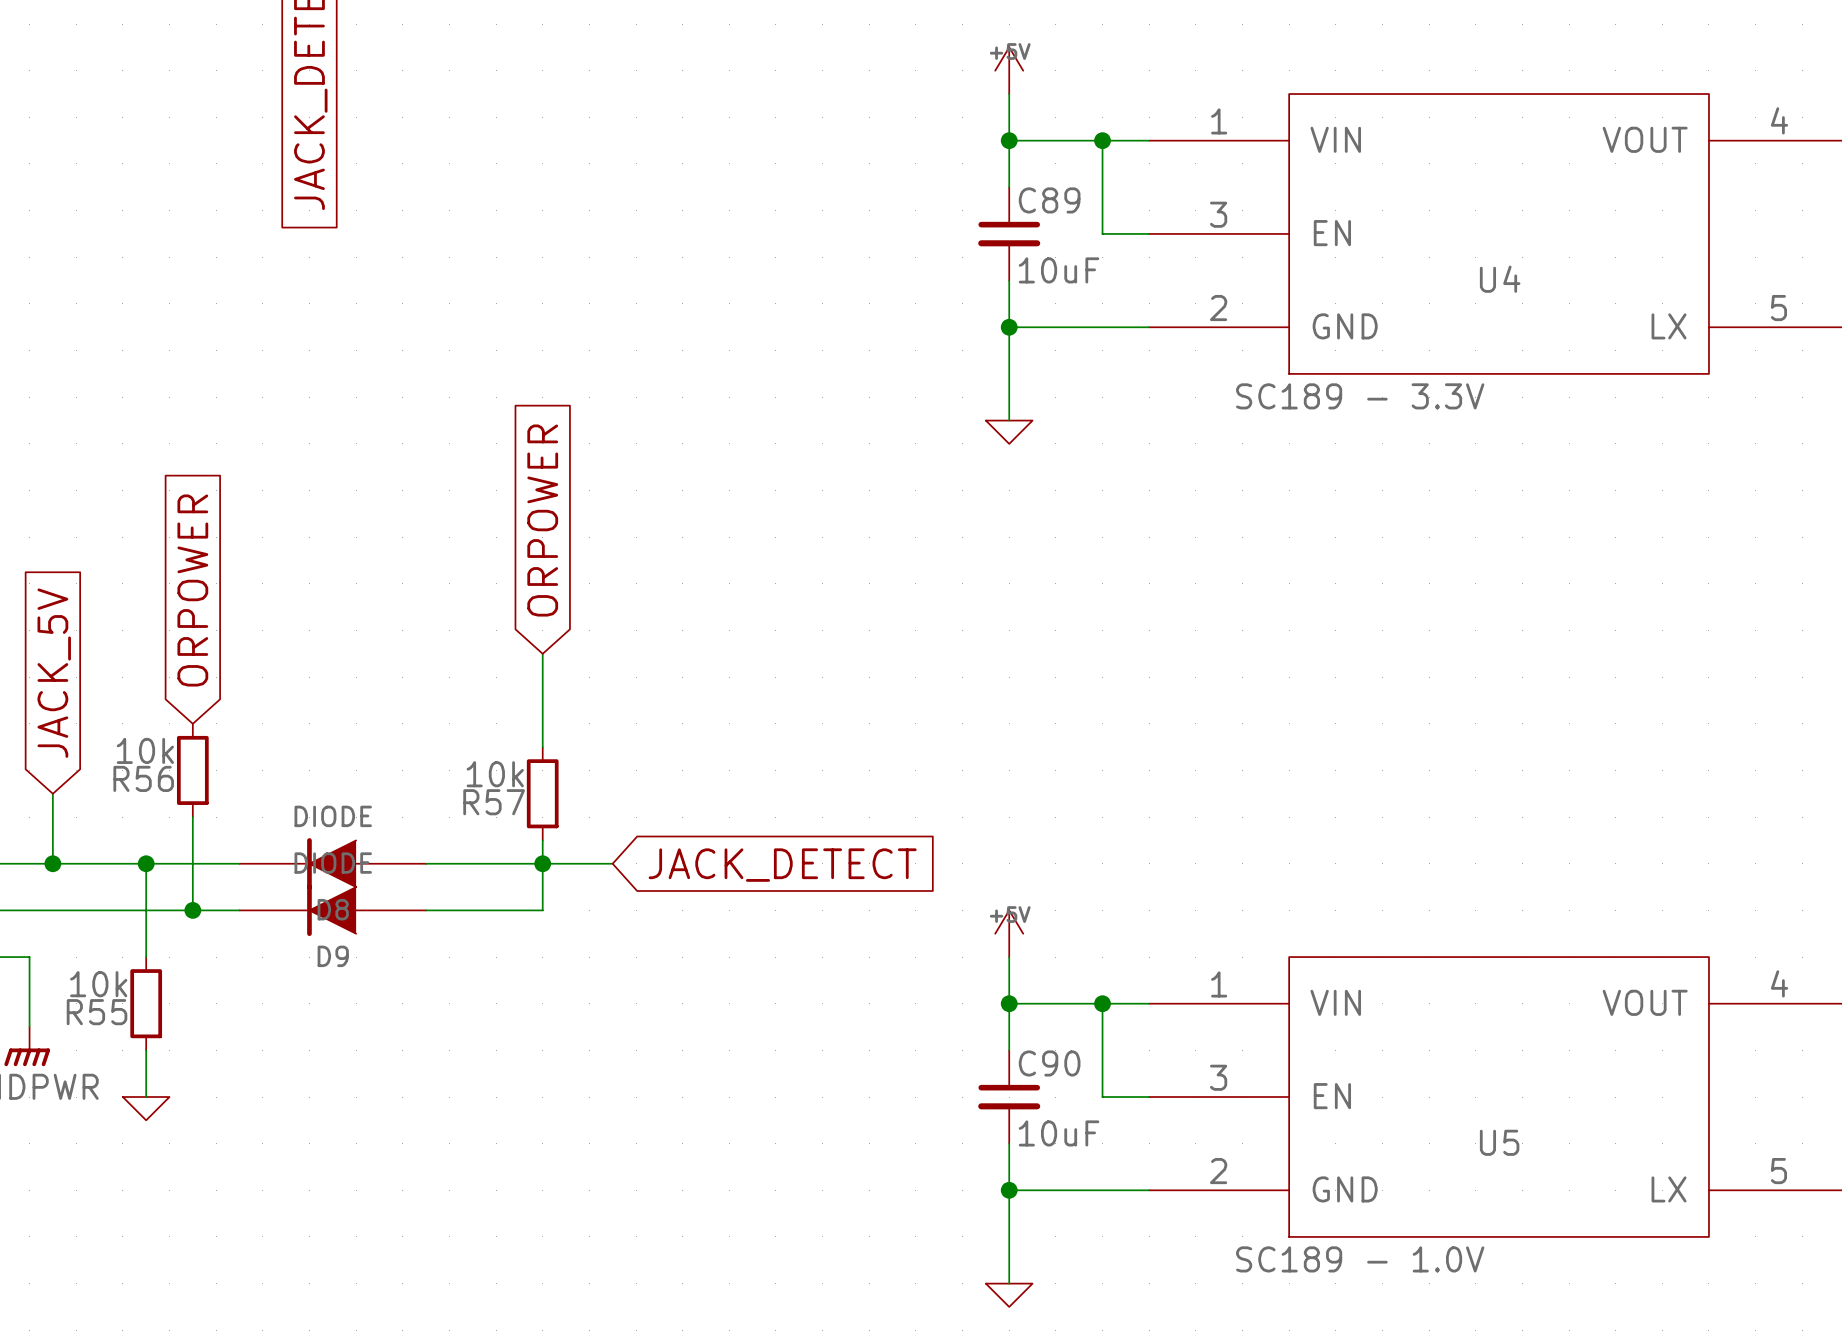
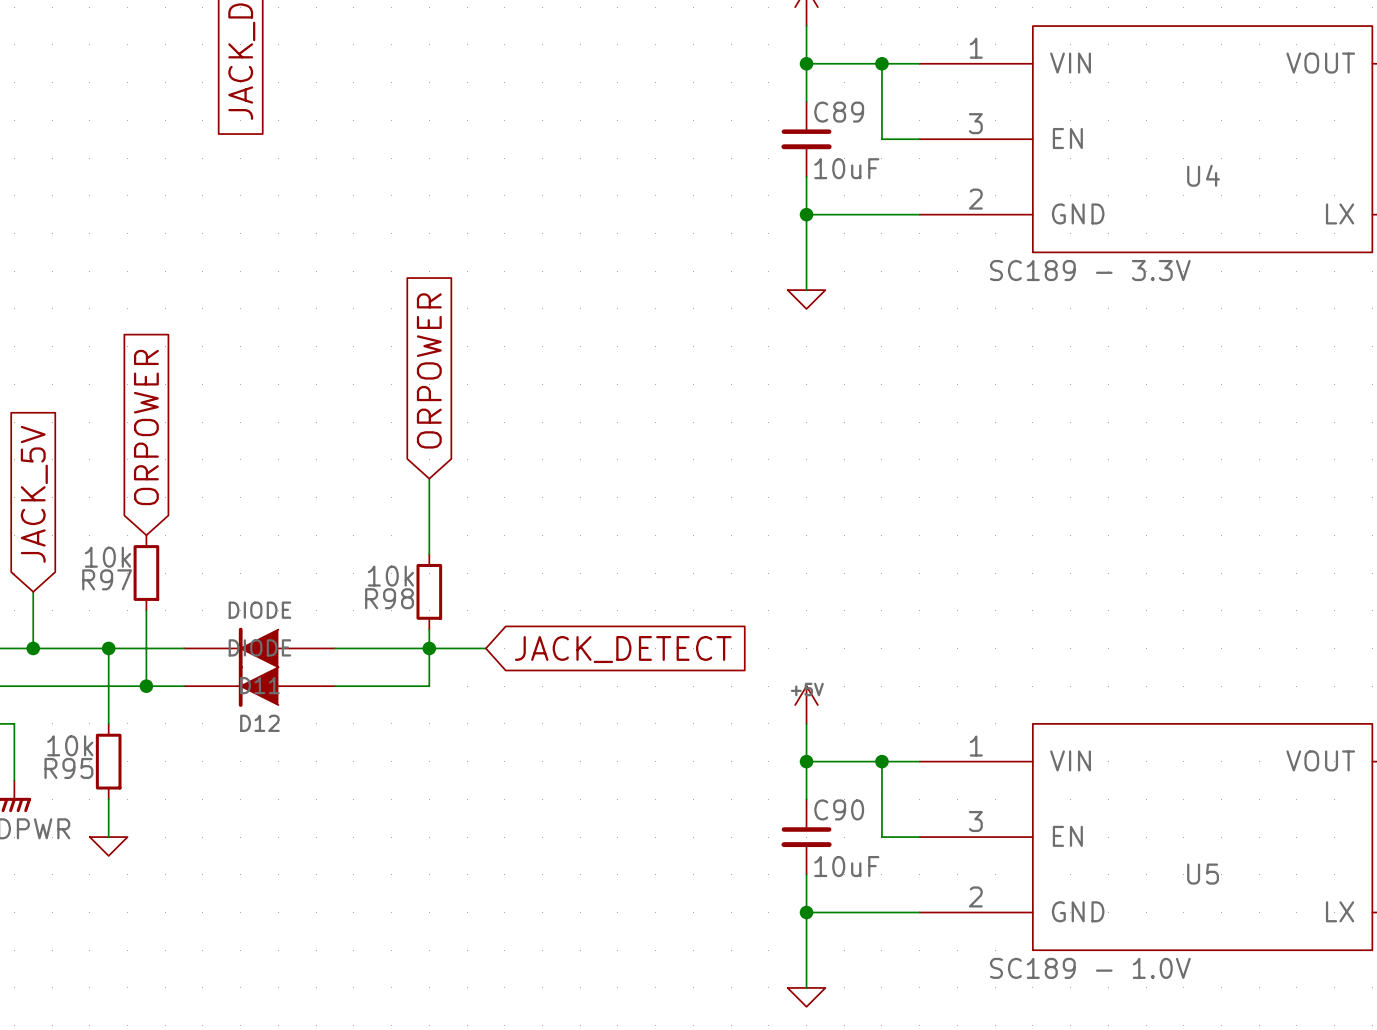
R56 name: R56 (143, 778) -> R97 (107, 579)
R57 name: R57 (494, 802) -> R98 (389, 598)
D8 name: D8 (333, 909) -> D11 (259, 685)
D9 name: D9 (333, 956) -> D12 (259, 723)
R55 name: R55 (97, 1012) -> R95 (68, 768)

